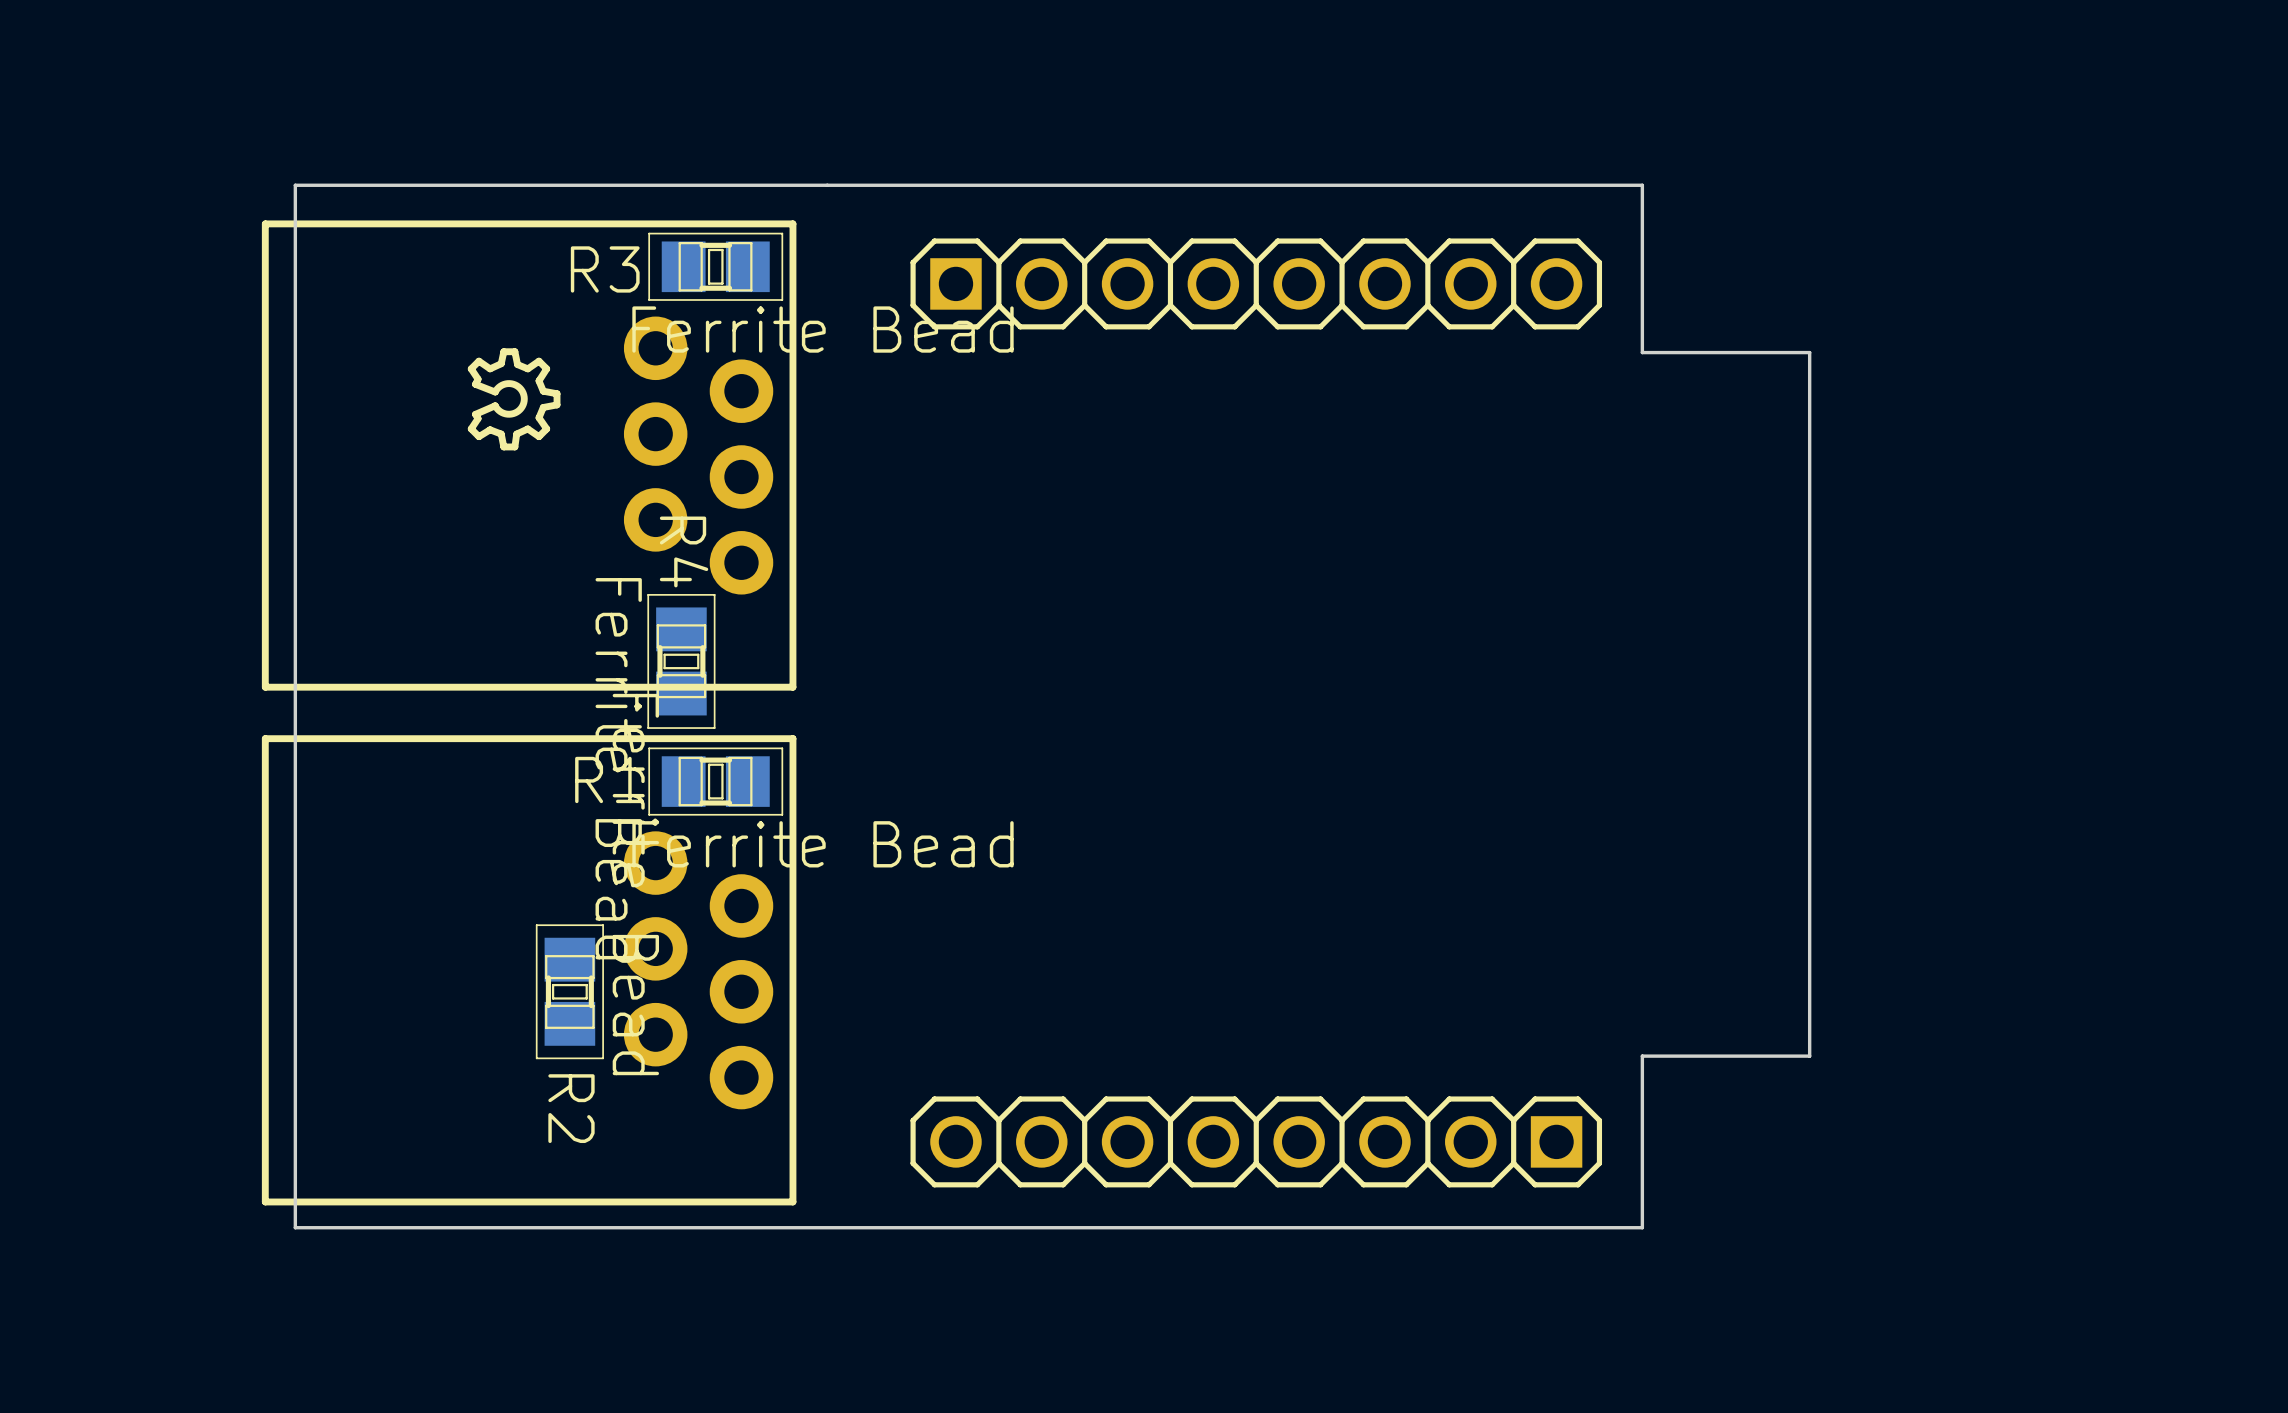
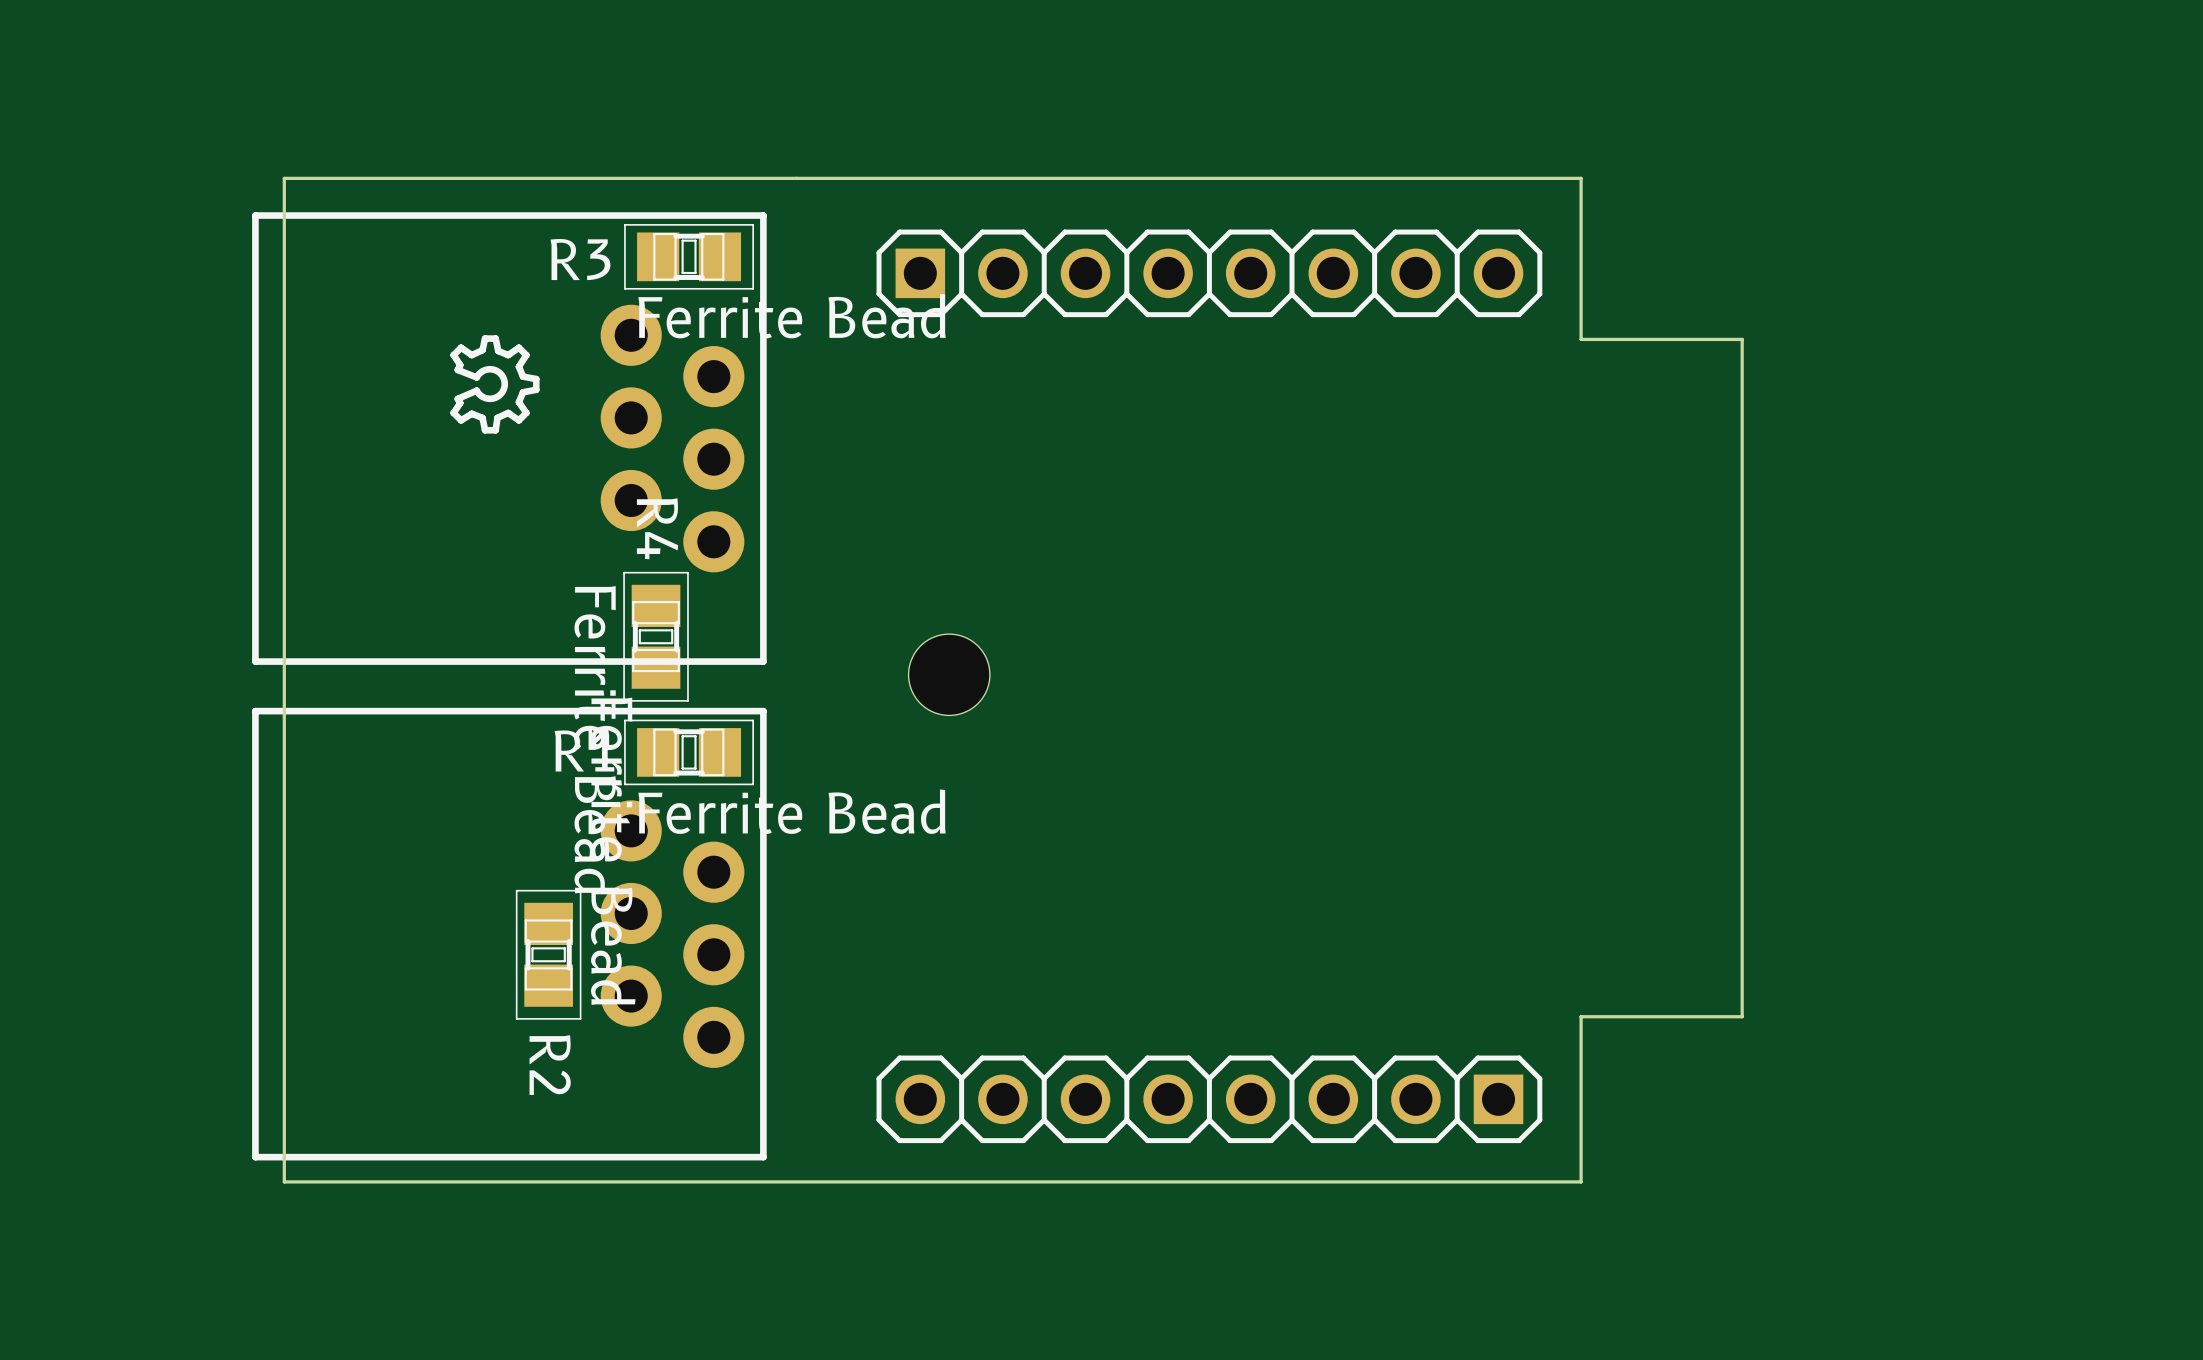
part: none -> (949, 674)

